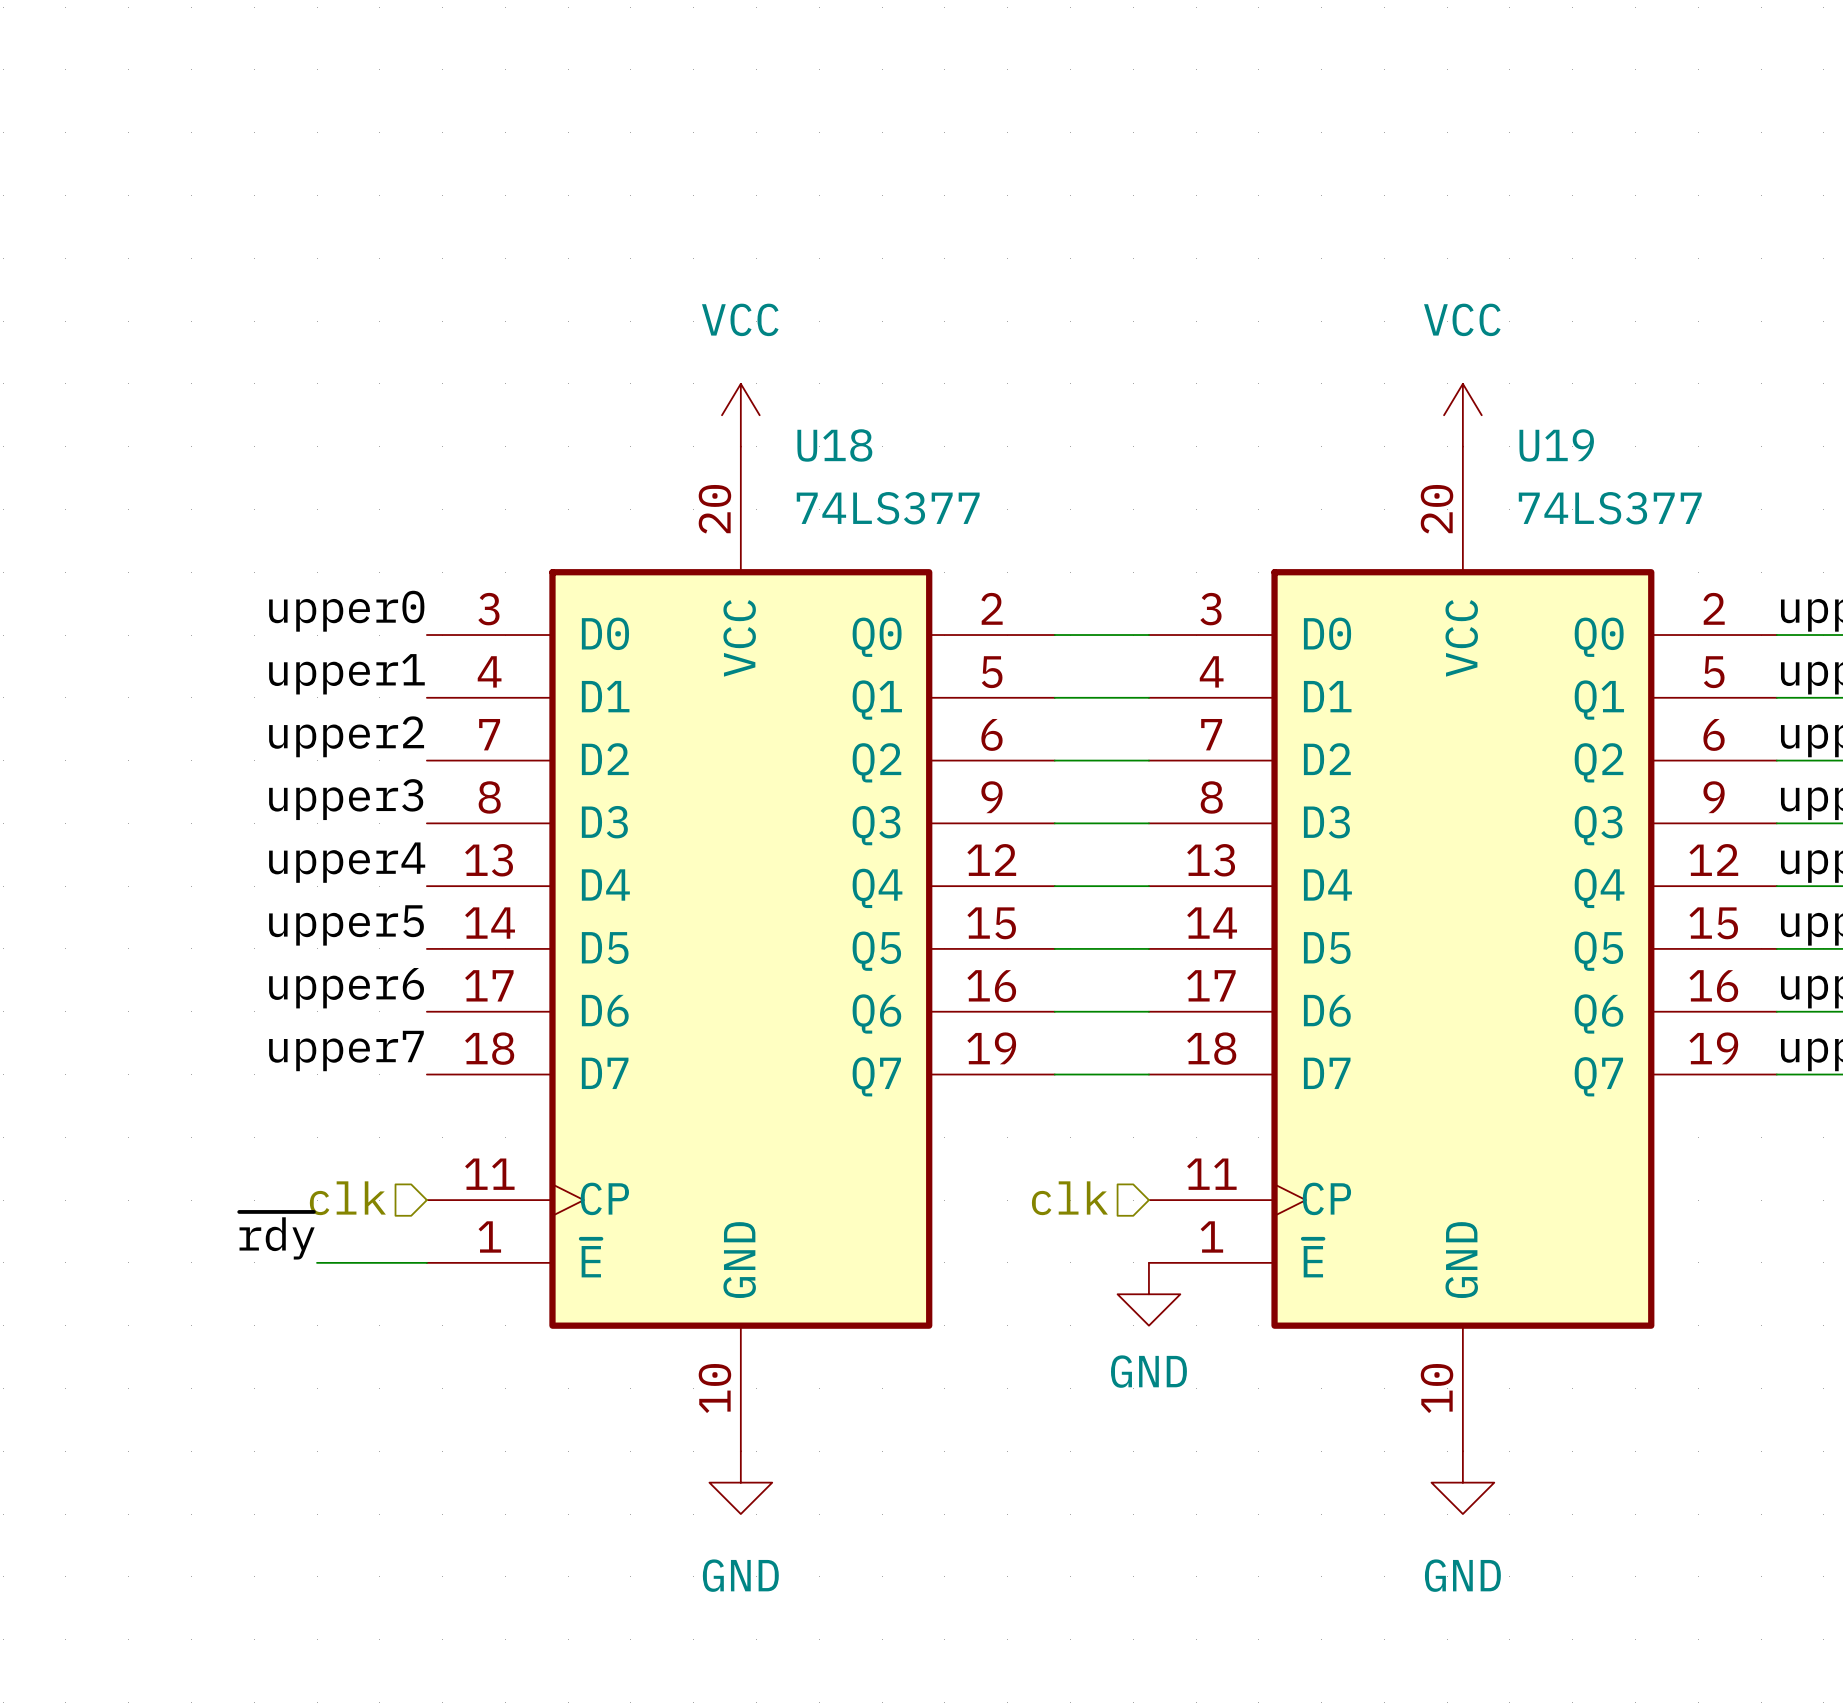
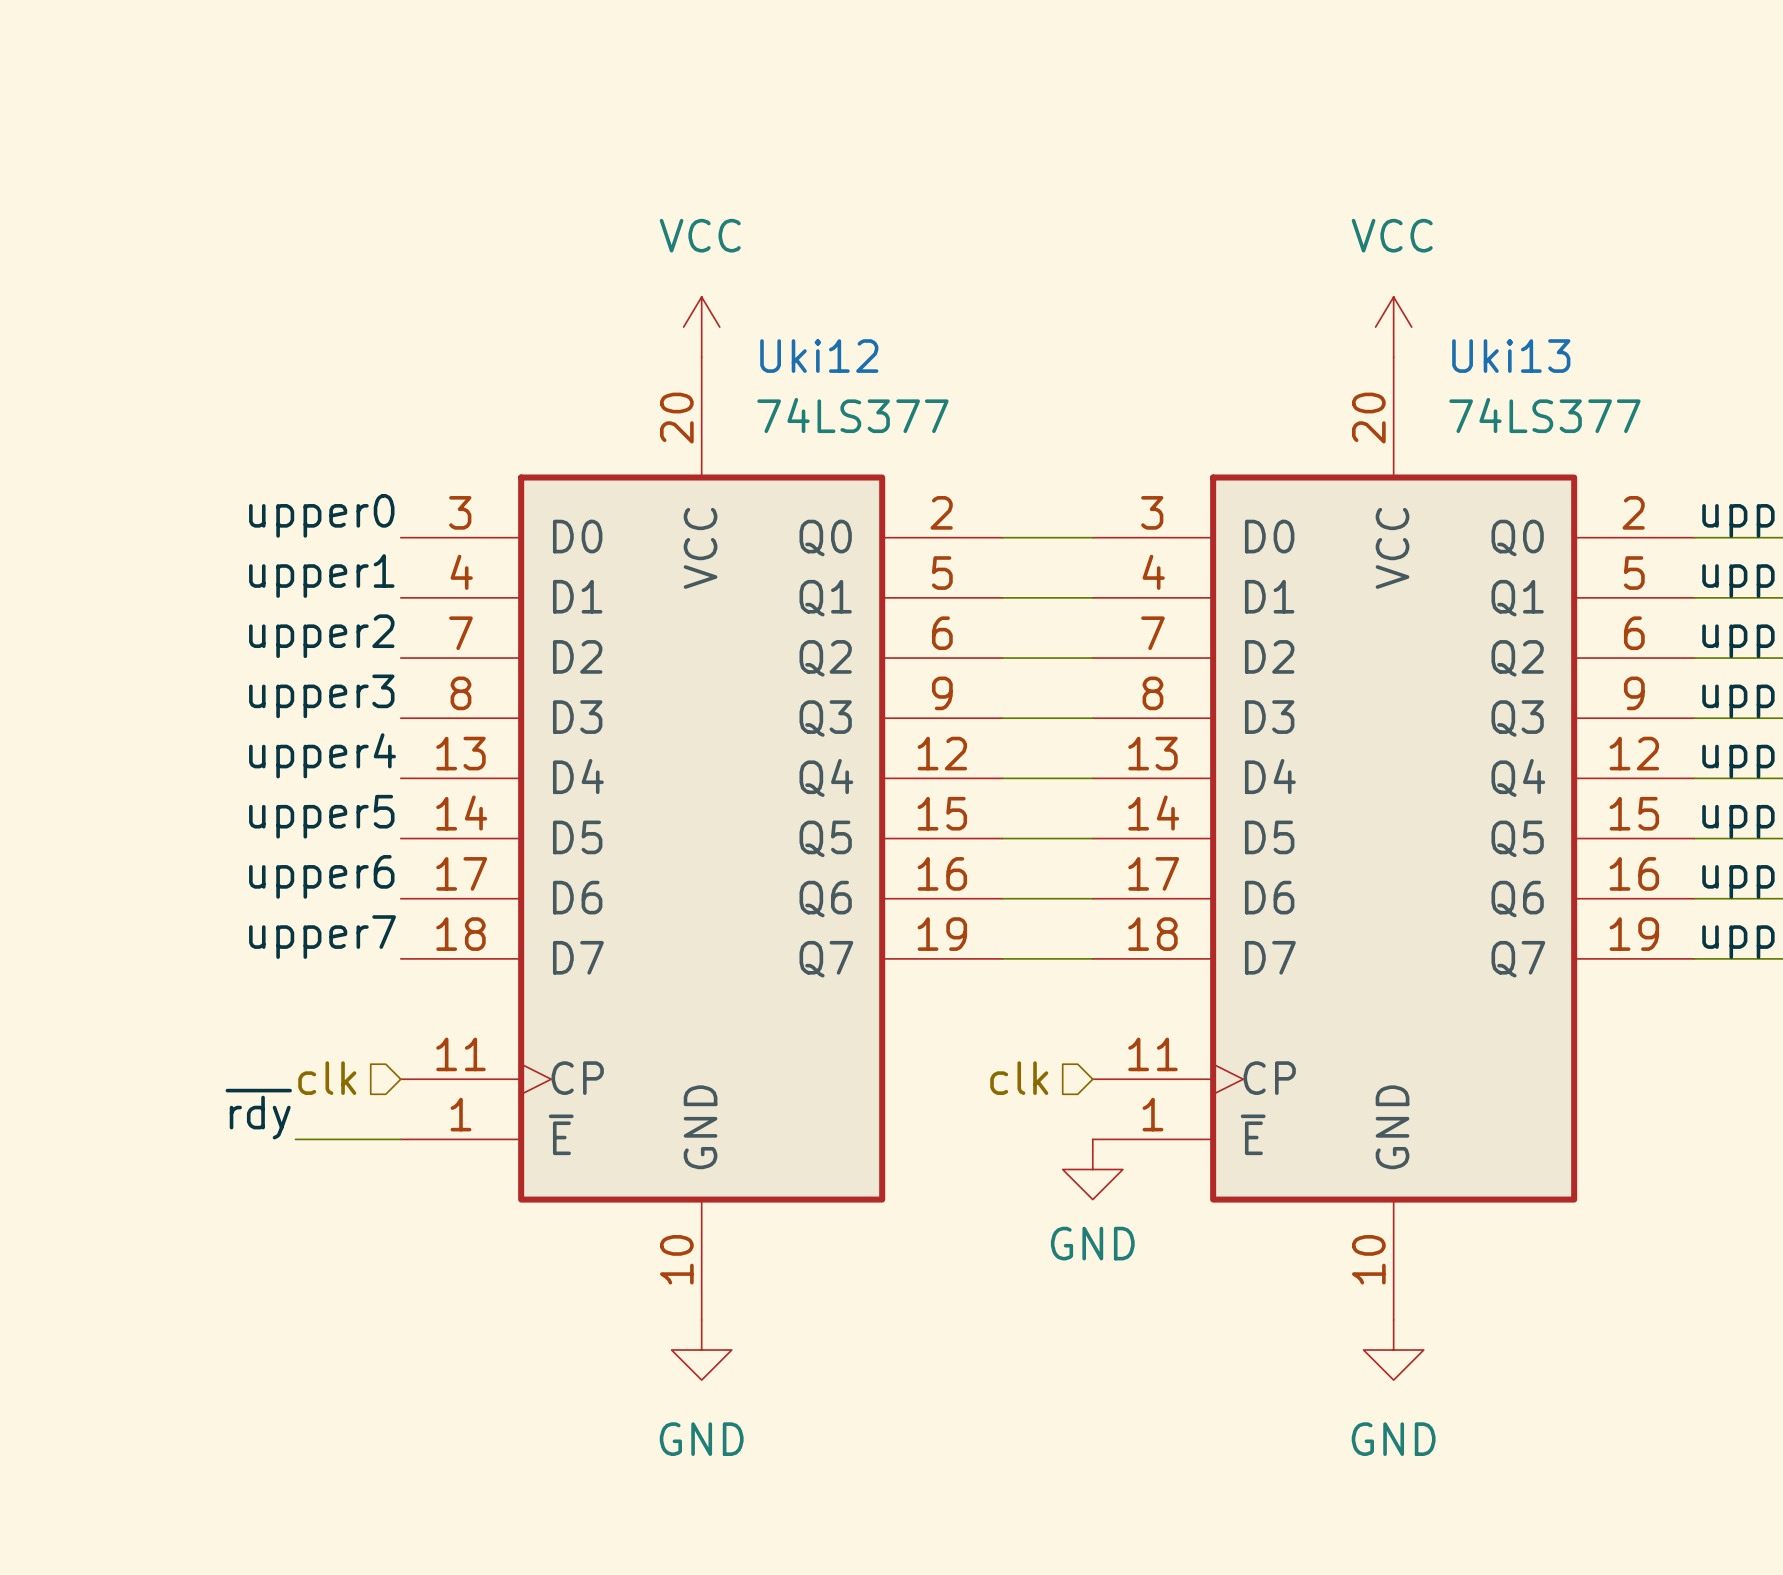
U18 name: U18 (834, 445) -> Uki12 (819, 356)
U19 name: U19 (1556, 445) -> Uki13 (1511, 356)

